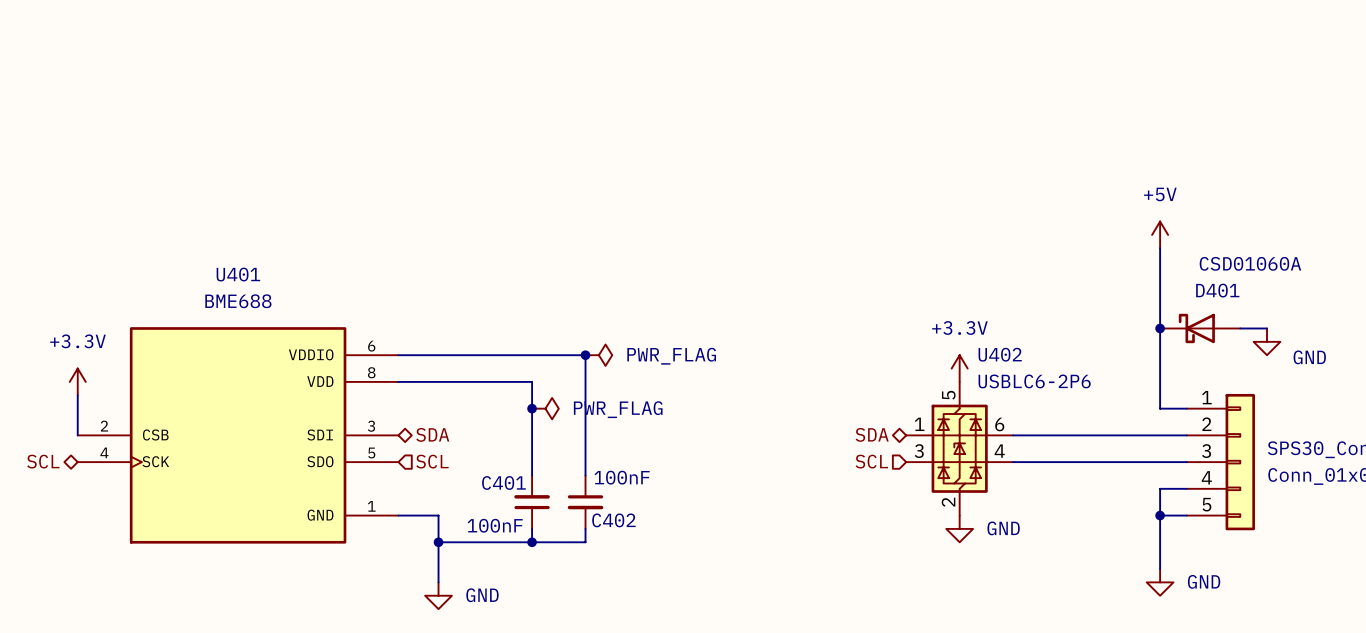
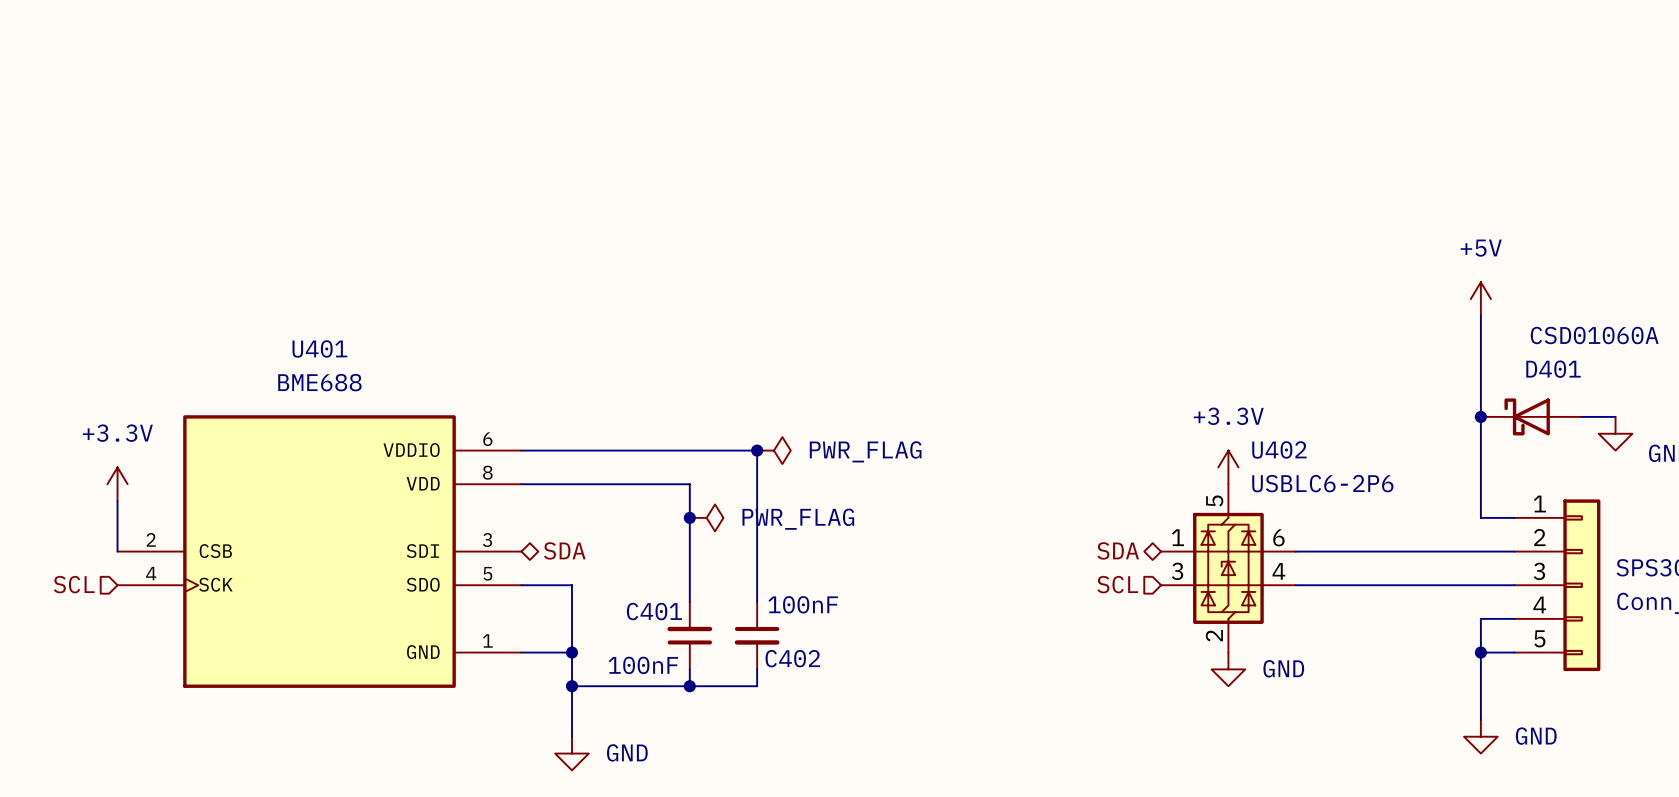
hierarchical label shape: bidirectional (43, 461) -> input (74, 584)
hierarchical label: SCL (432, 461) -> none
wire: none -> (521, 585) (571, 585) (571, 652)
junction: none -> (571, 652)

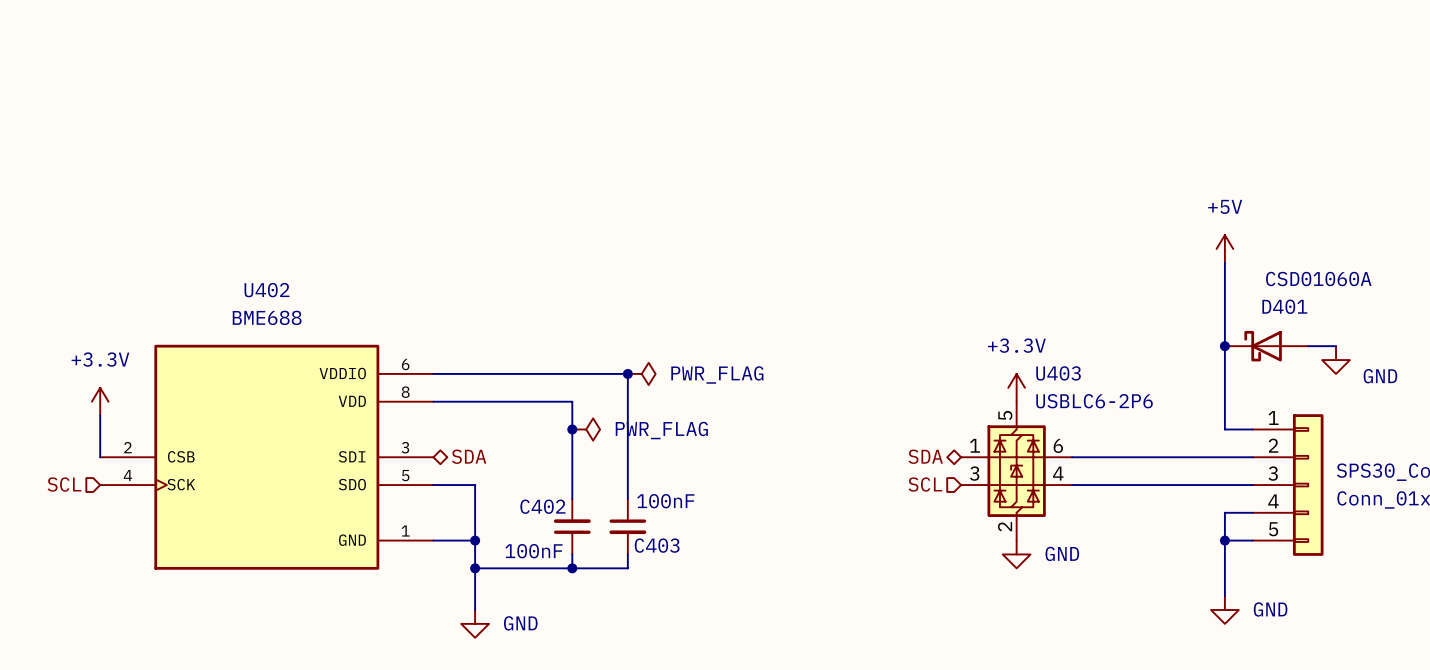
U401 name: U401 (319, 348) -> U402 (266, 290)
U402 name: U402 (1279, 449) -> U403 (1058, 373)
C401 name: C401 (654, 611) -> C402 (542, 506)
C402 name: C402 (792, 658) -> C403 (657, 545)

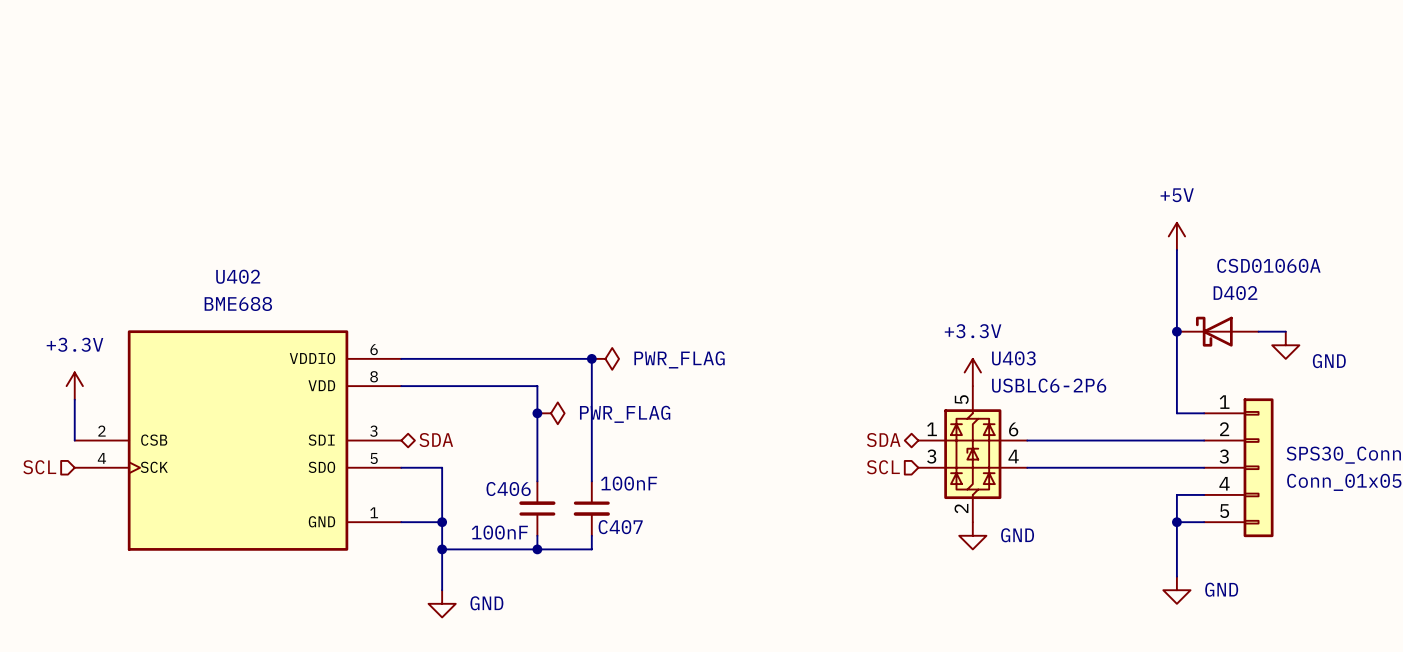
D401 name: D401 (1284, 306) -> D402 (1235, 293)
C402 name: C402 (542, 506) -> C406 (508, 489)
C403 name: C403 (657, 545) -> C407 (620, 527)

